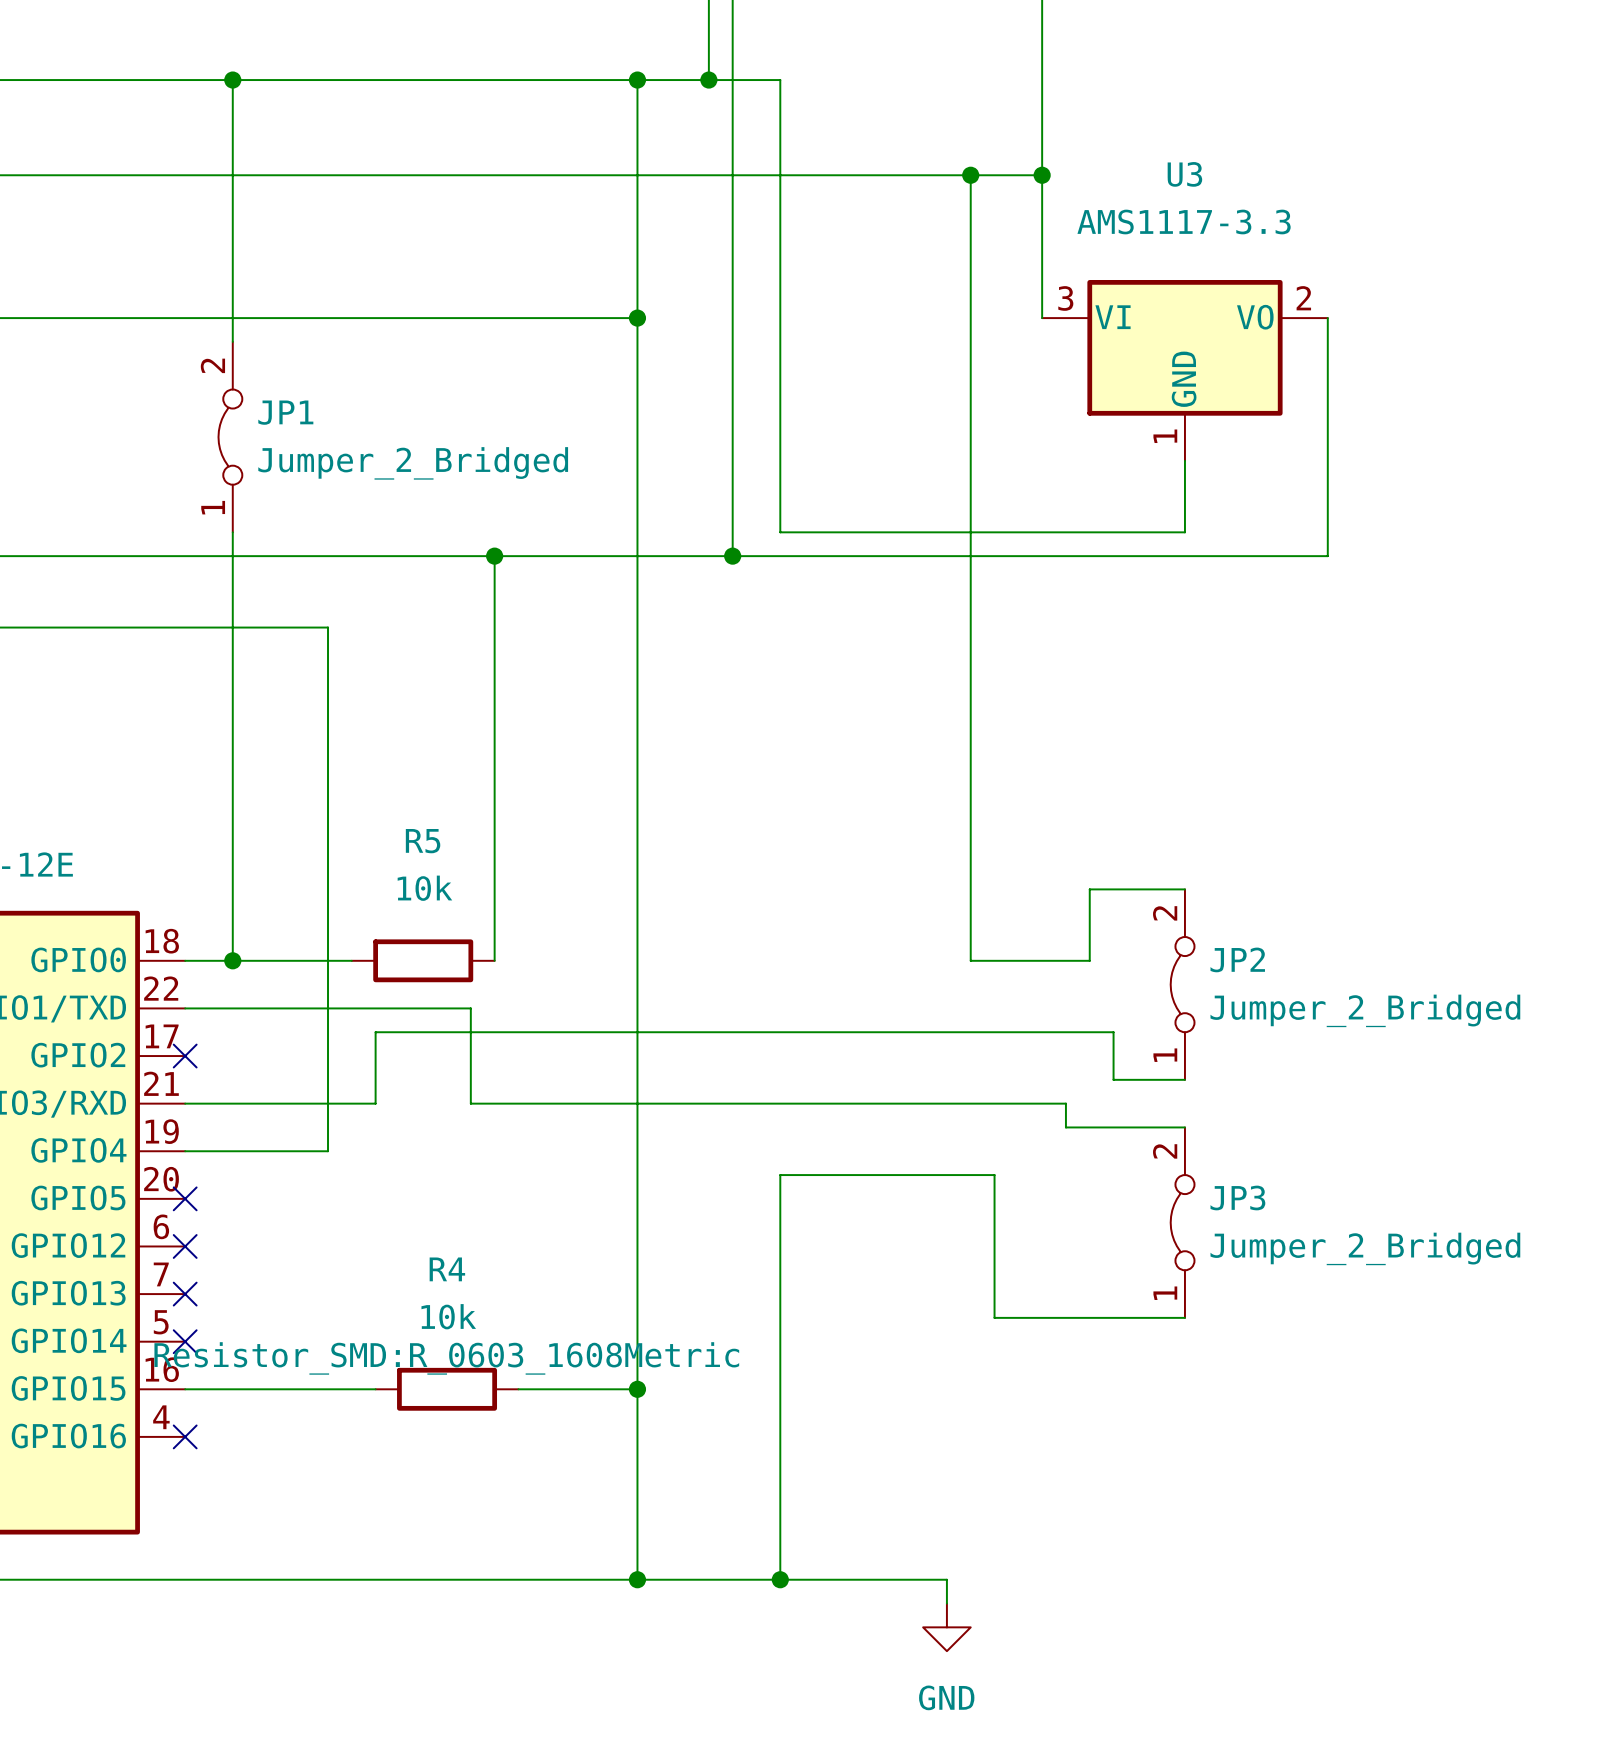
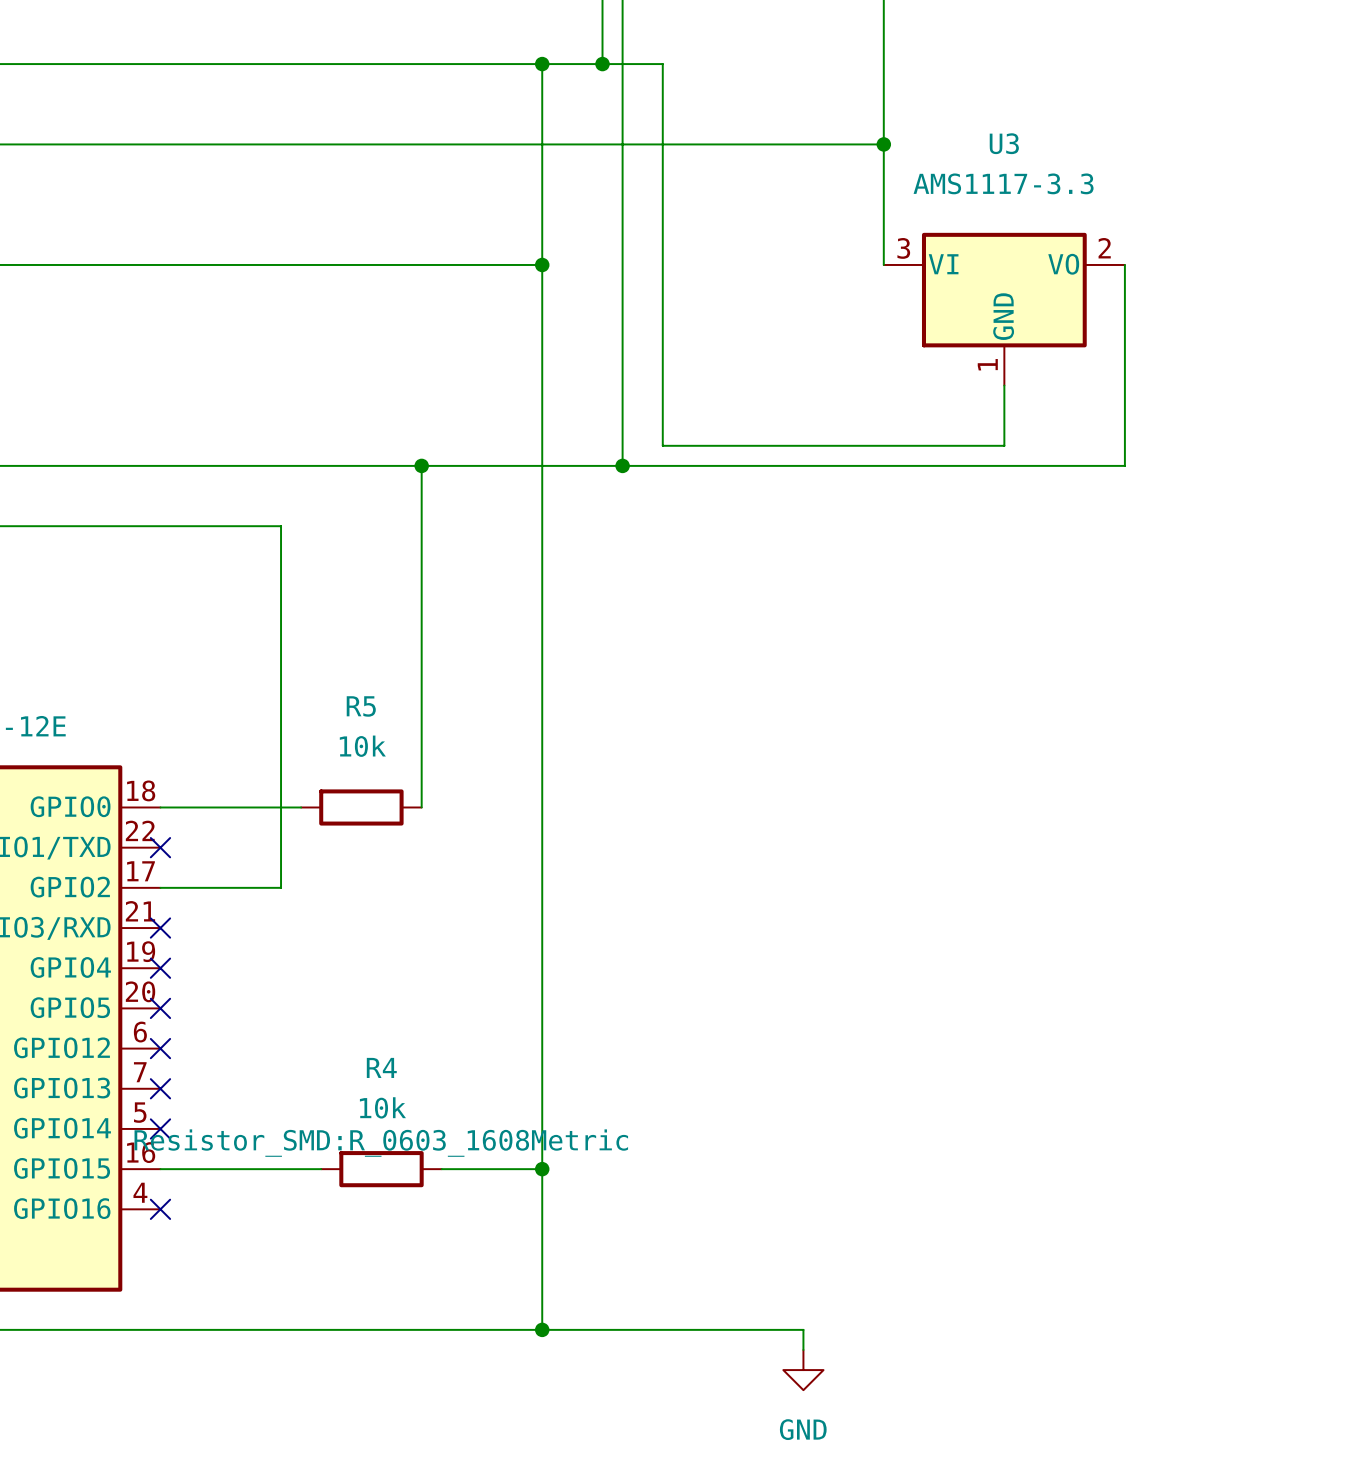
wire: (232, 80) (232, 341) -> none
junction: (232, 80) -> none
wire: (970, 175) (970, 960) (1089, 960) (1089, 889) (1184, 889) -> none
junction: (970, 175) -> none
JP1: Jumper_2_Bridged (230, 437) -> none
wire: (232, 532) (232, 960) -> none
junction: (232, 960) -> none
JP2: Jumper_2_Bridged (1182, 984) -> none
wire: (185, 1008) (470, 1008) (470, 1103) (1065, 1103) (1065, 1127) (1184, 1127) -> none
no-connect mark: none -> (160, 847)
no-connect mark: (185, 1056) -> none
wire: (328, 1056) (328, 1151) (185, 1151) -> (281, 887) (160, 887)
wire: (1184, 1079) (1113, 1079) (1113, 1032) (375, 1032) (375, 1103) (185, 1103) -> none
no-connect mark: none -> (160, 928)
no-connect mark: none -> (160, 968)
JP3: Jumper_2_Bridged (1182, 1222) -> none
wire: (1184, 1317) (994, 1317) (994, 1175) (780, 1175) (780, 1579) -> none
junction: (780, 1579) -> none

